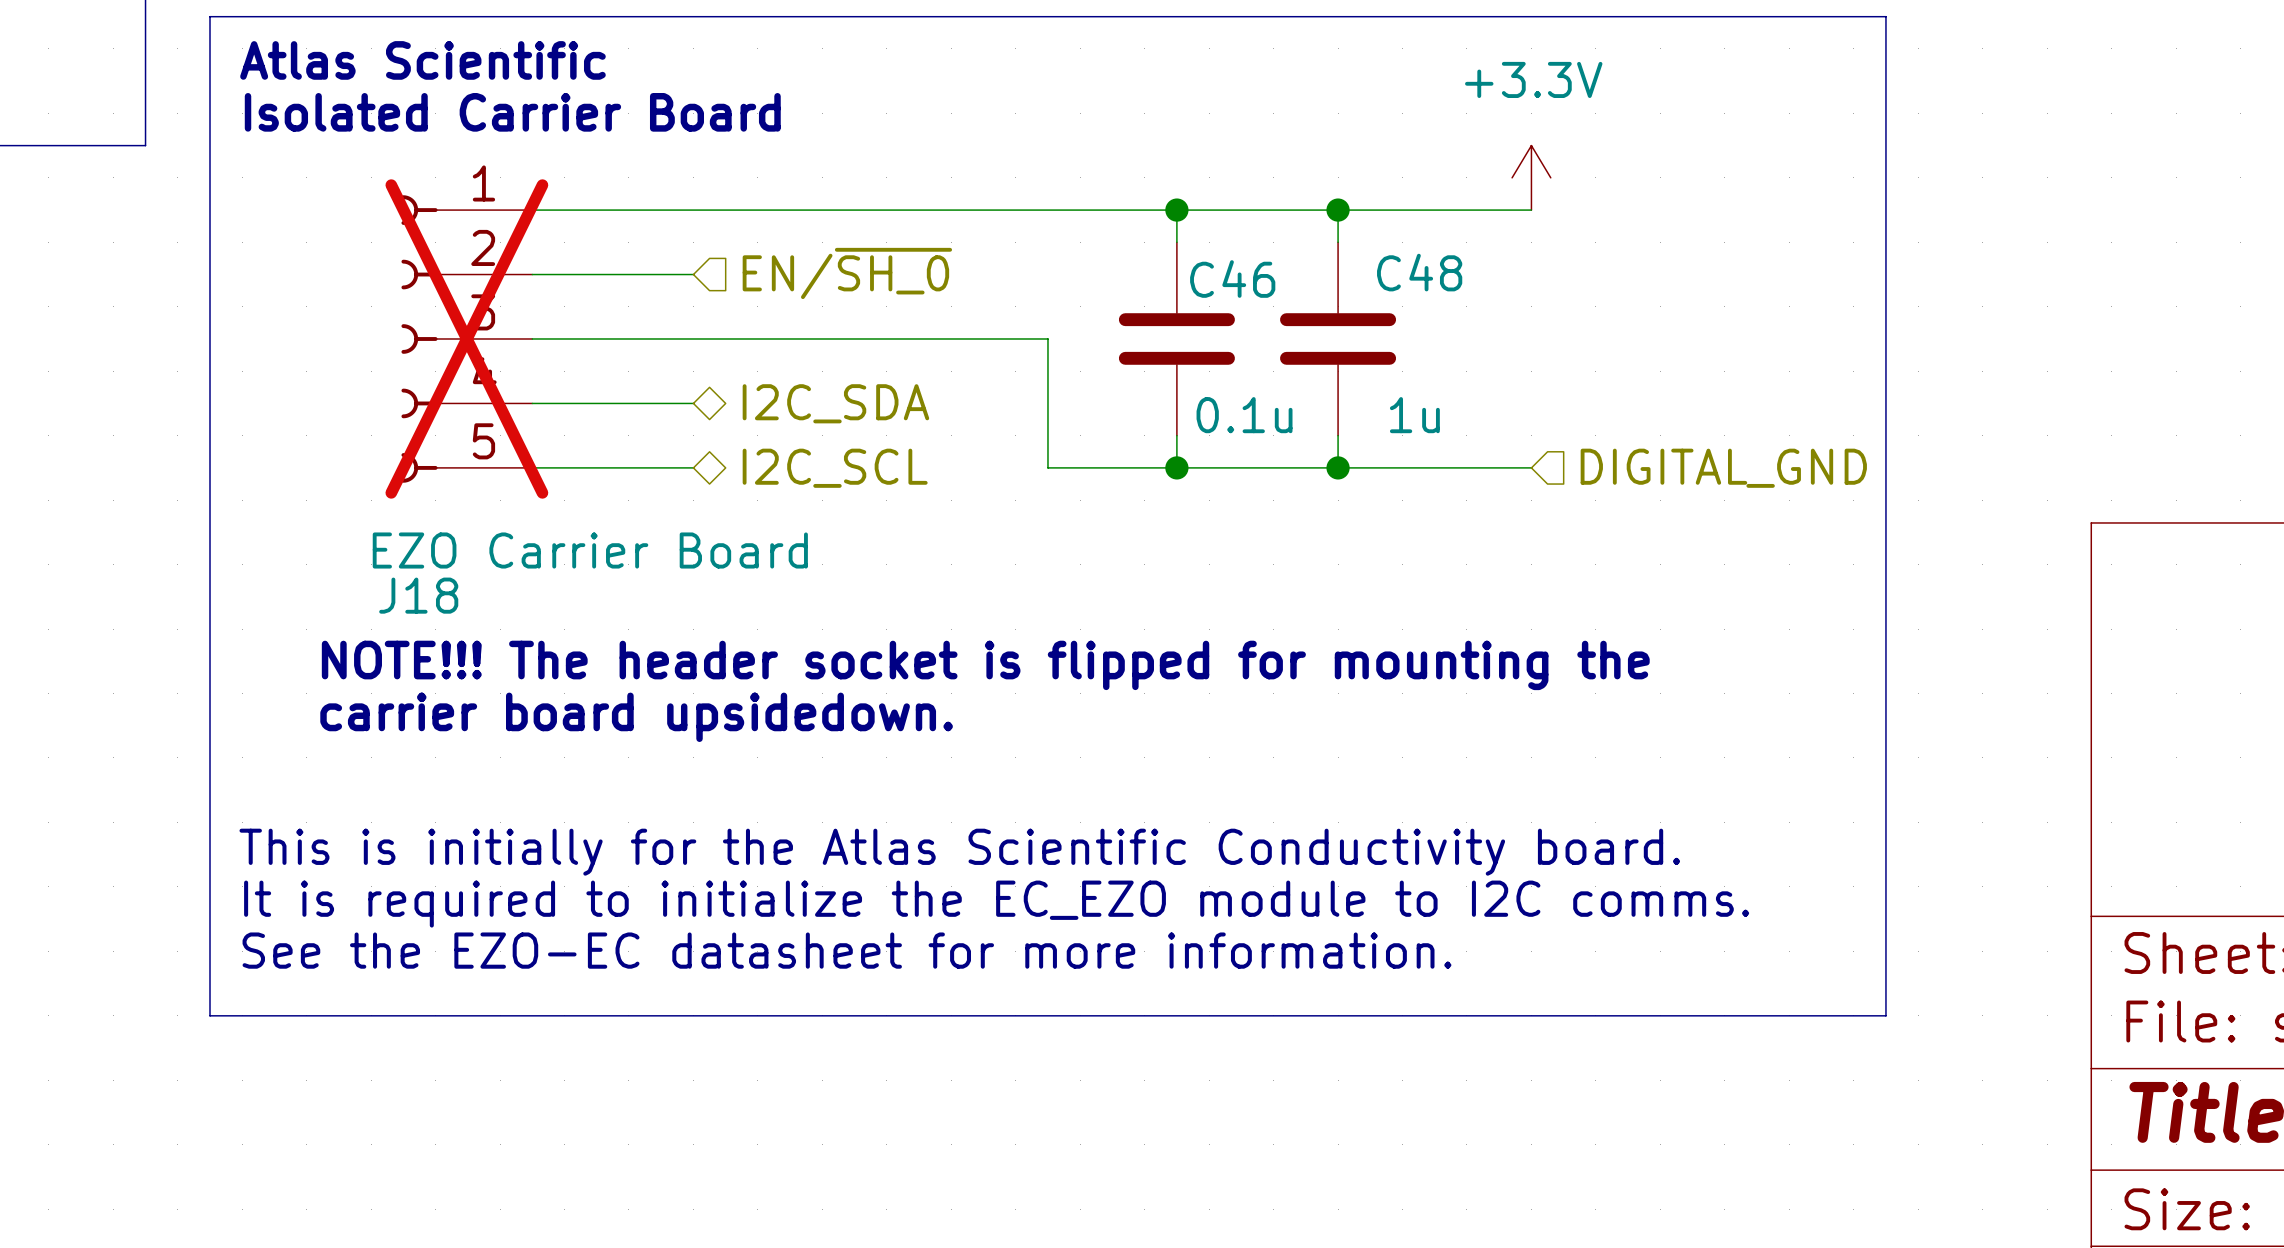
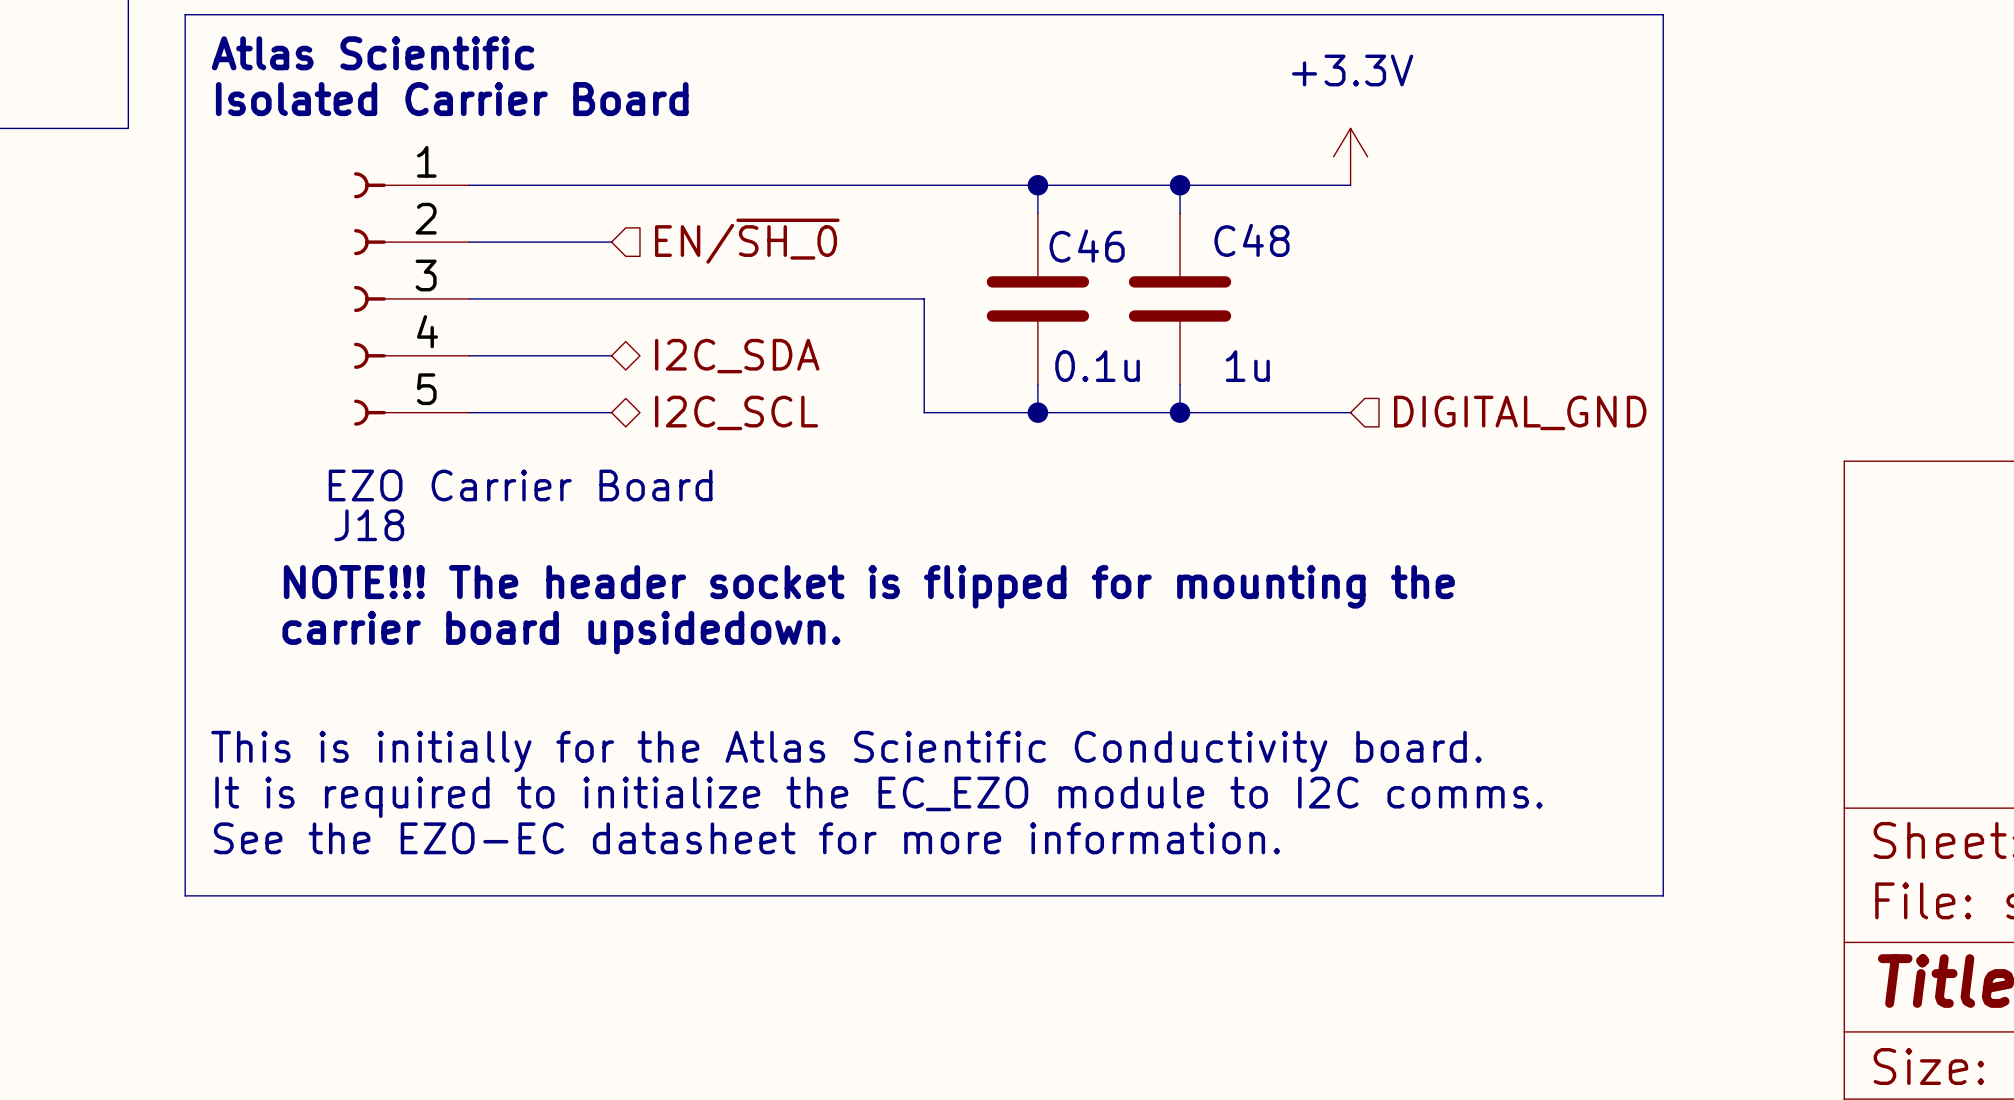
J18 do-not-place cross: (466, 338) -> none

